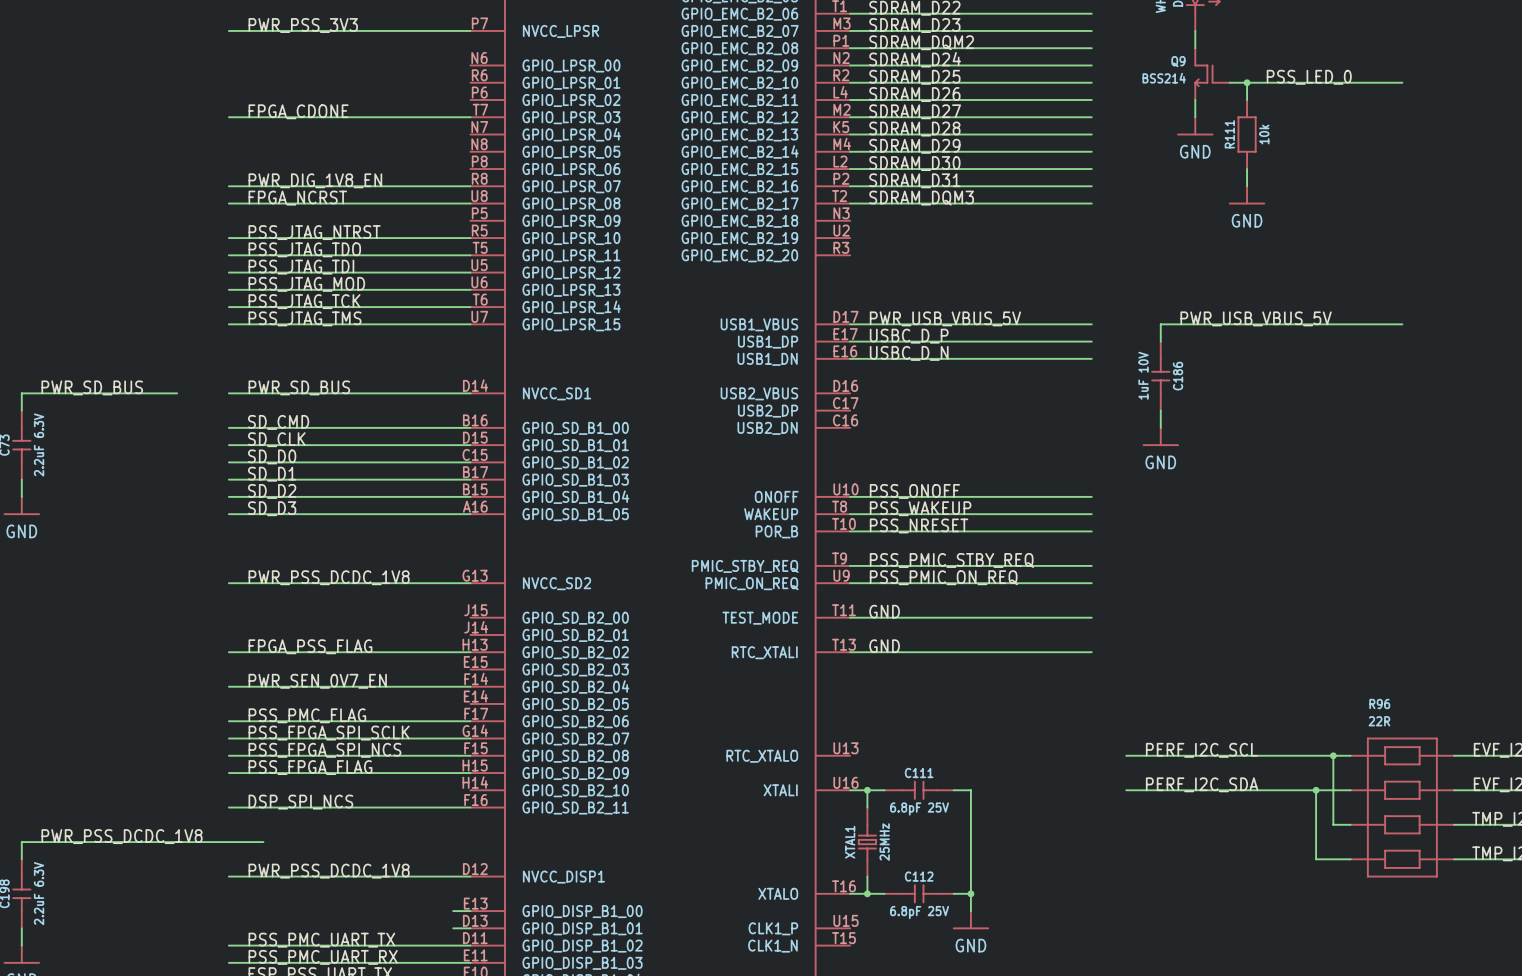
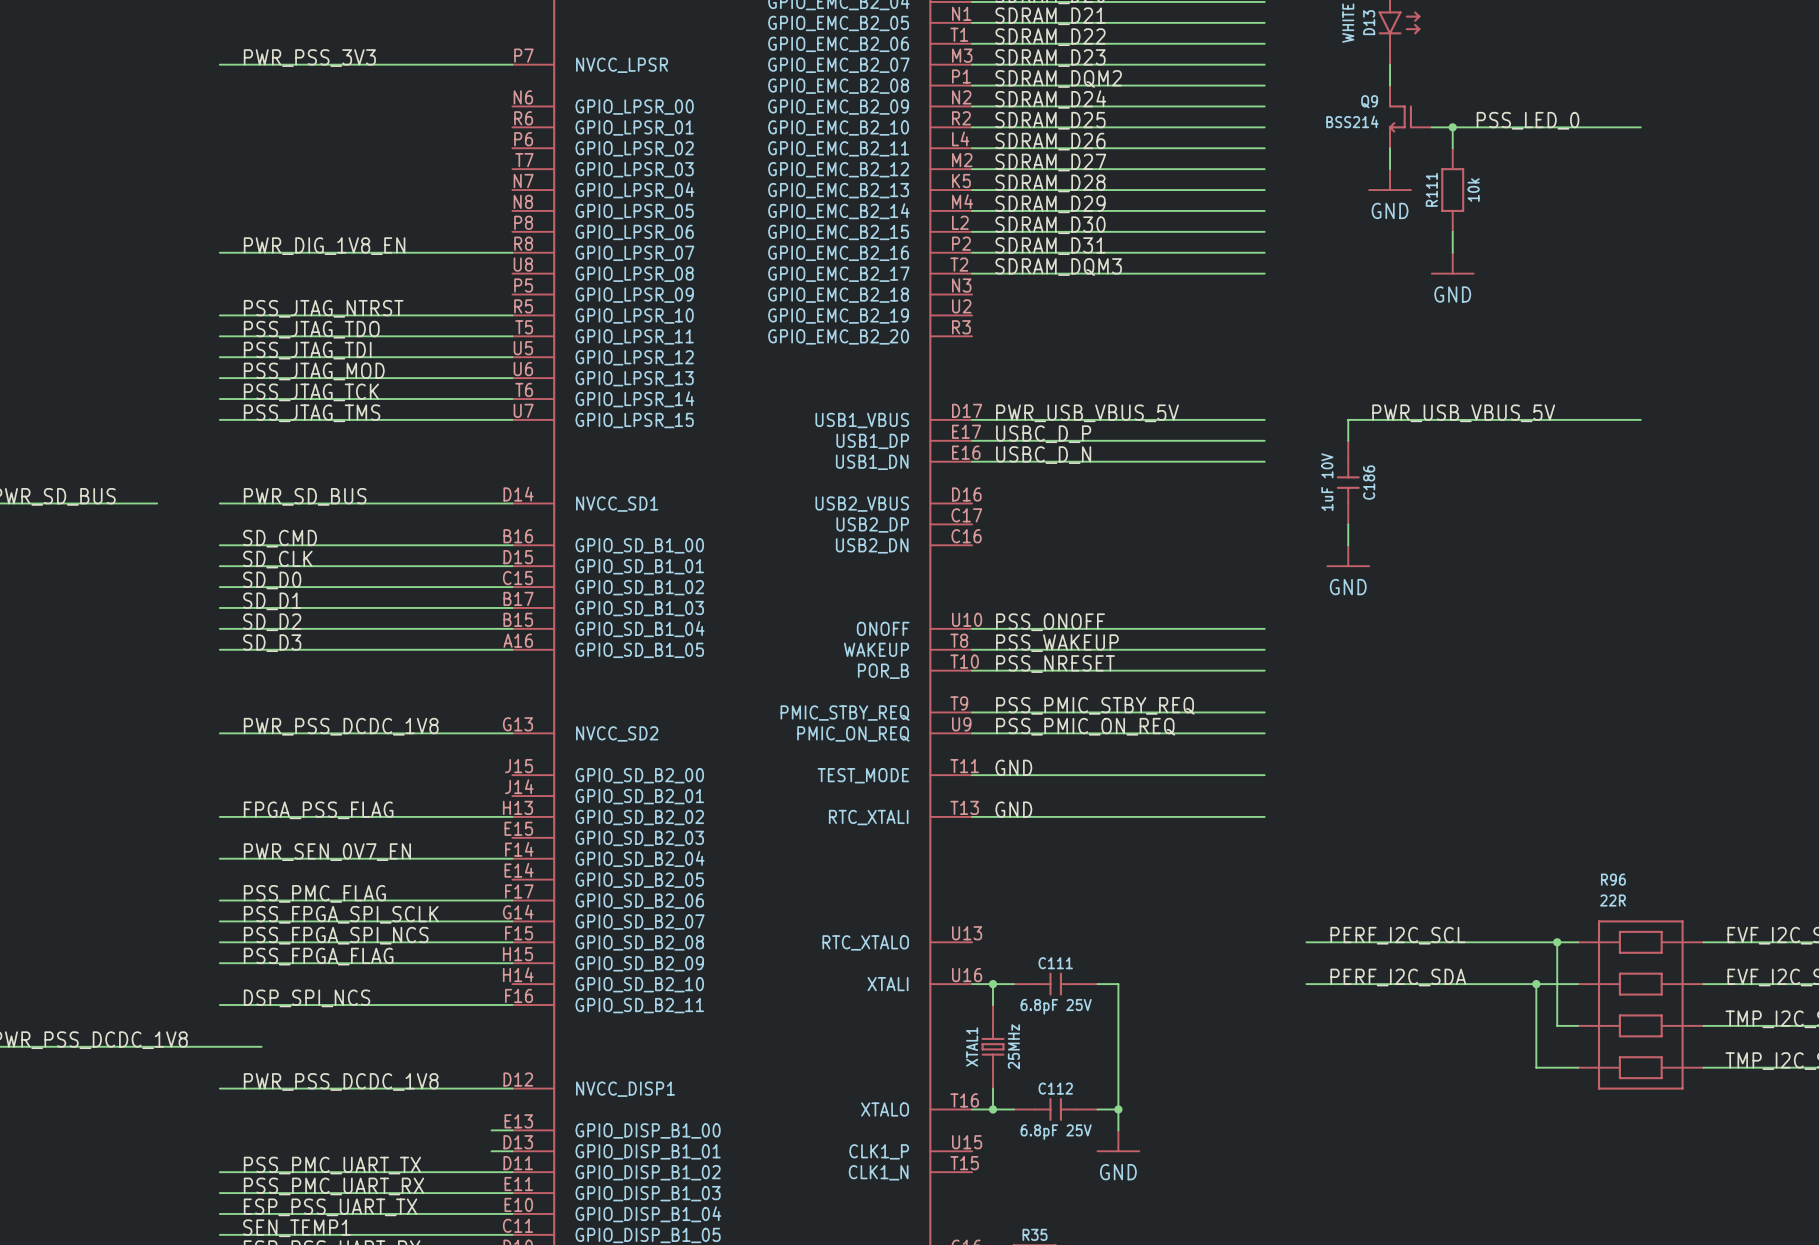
label: FPGA_CDONE (298, 111) -> none
wire: (228, 117) (470, 117) -> none
label: FPGA_NCRST (297, 198) -> none
wire: (228, 203) (470, 203) -> none

